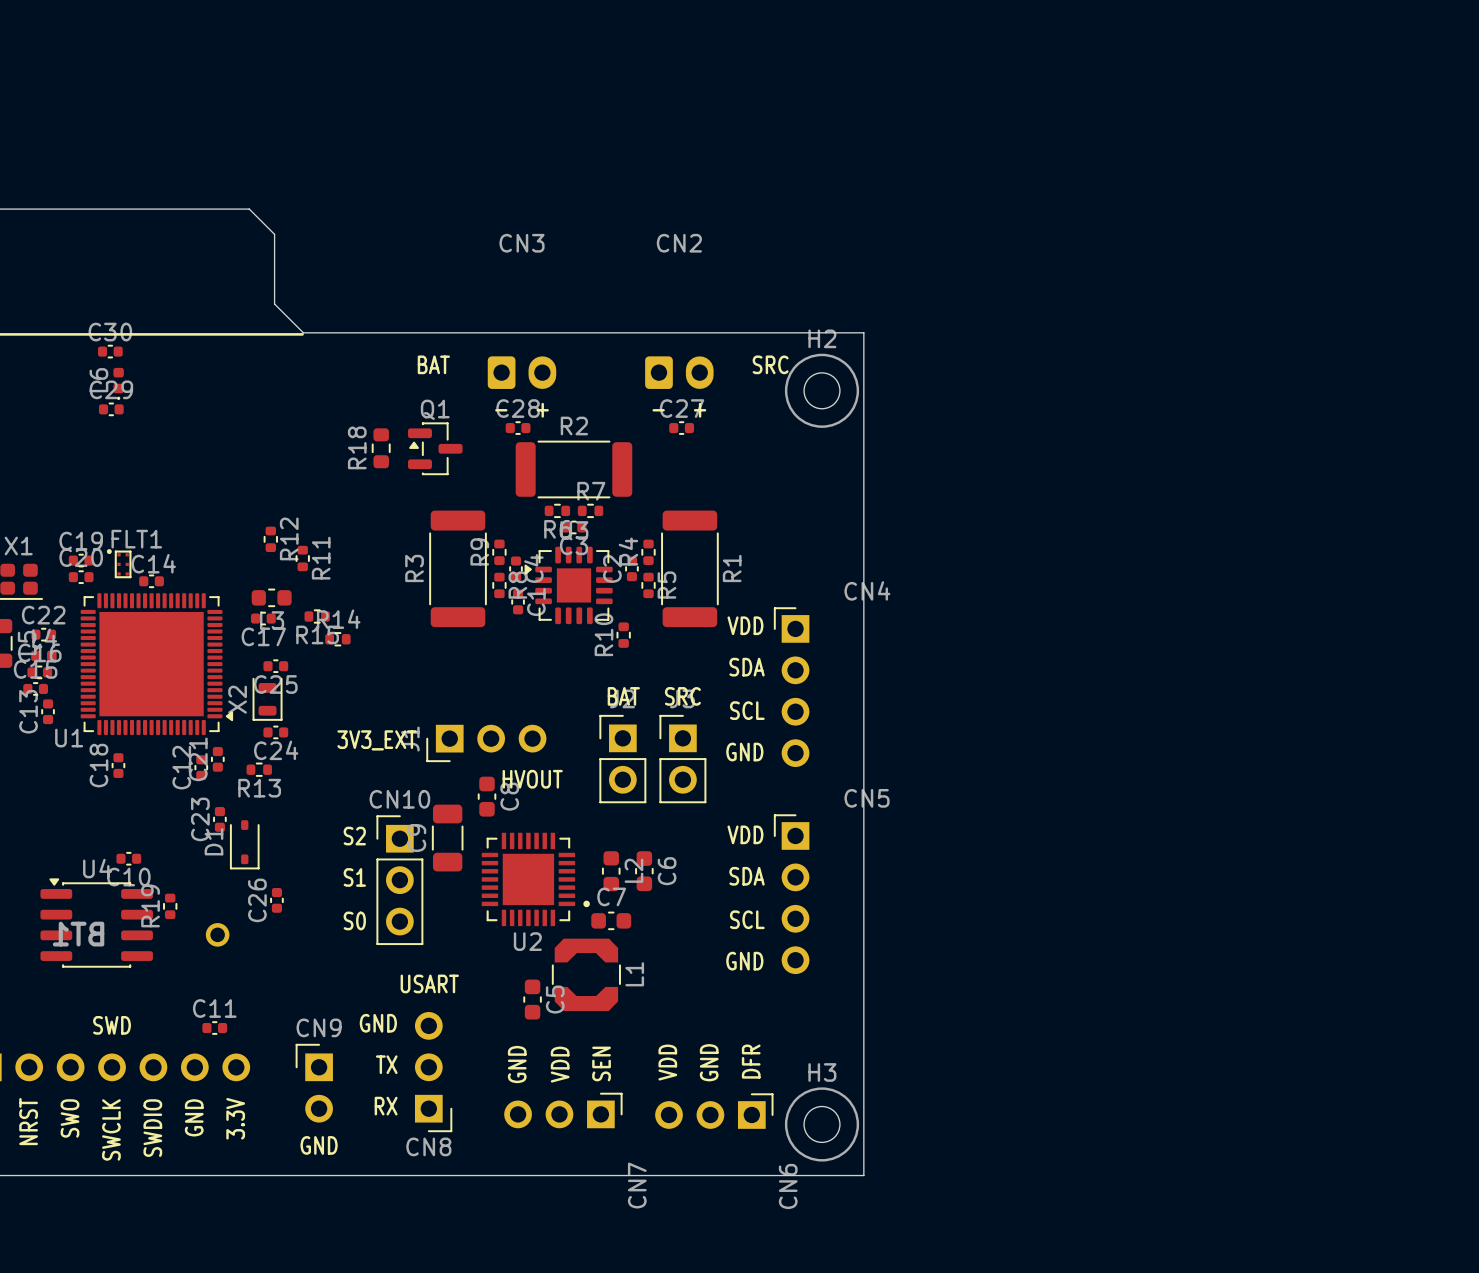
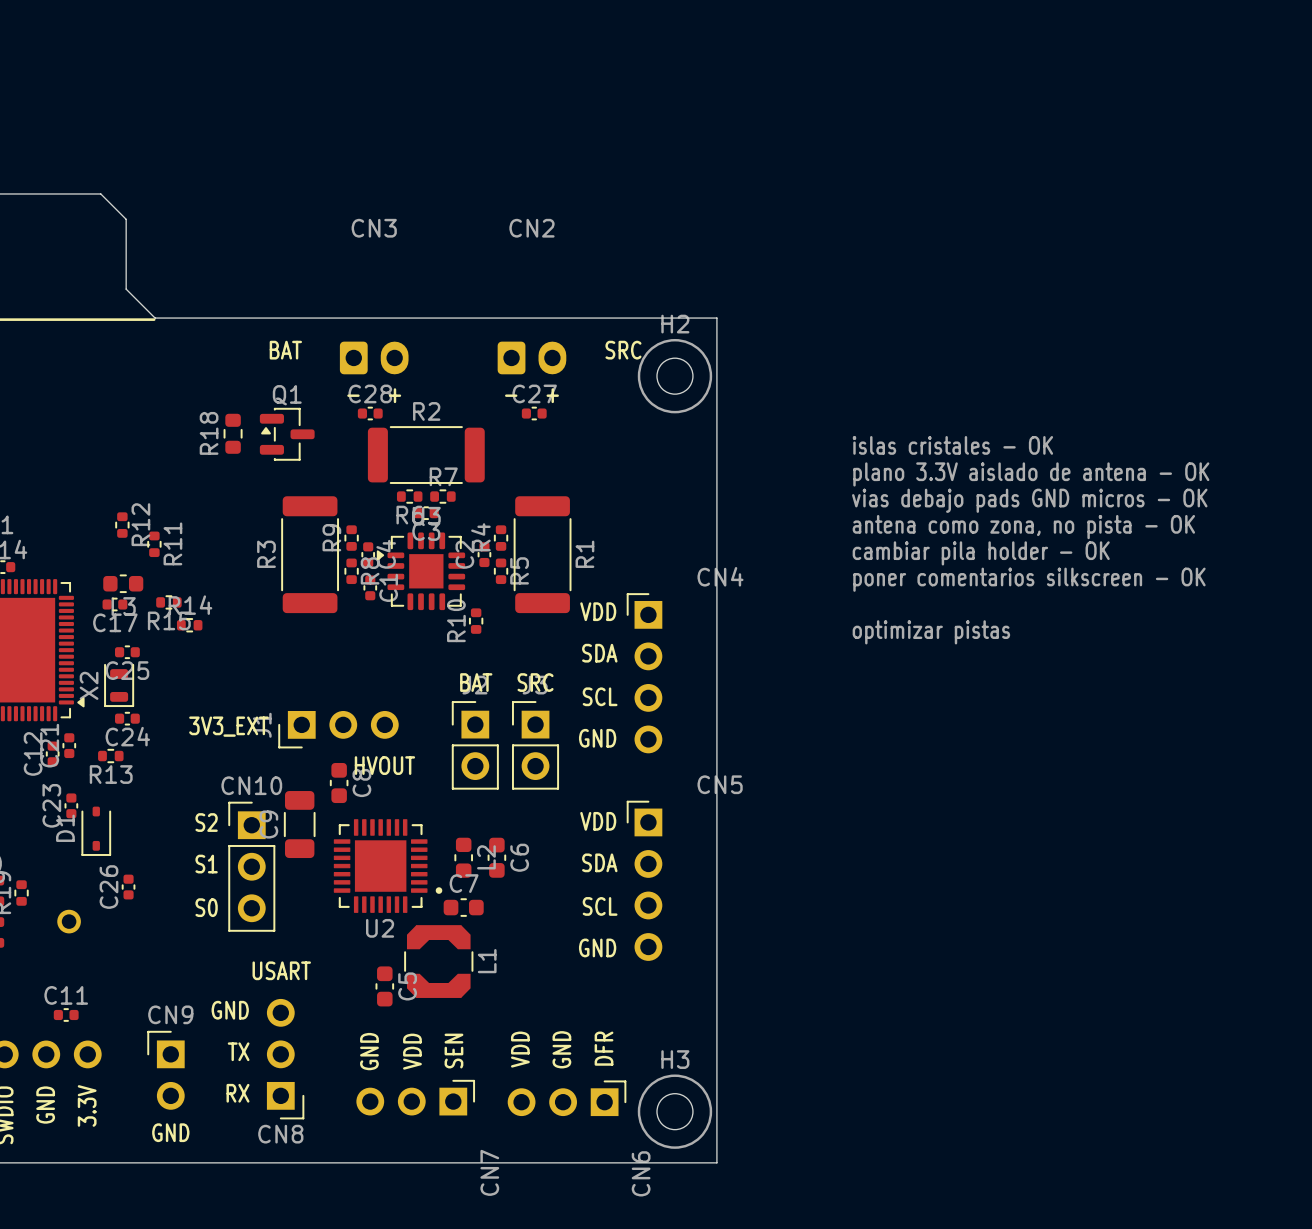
text: none -> islas cristales - OK (952, 445)
text: none -> plano 3.3V aislado de antena - OK (1031, 474)
text: none -> vias debajo pads GND micros - OK (1029, 500)
text: none -> antena como zona, no pista - OK (1023, 527)
text: none -> cambiar pila holder - OK (981, 553)
text: none -> poner comentarios silkscreen - OK (1029, 579)
text: none -> optimizar pistas (931, 632)

